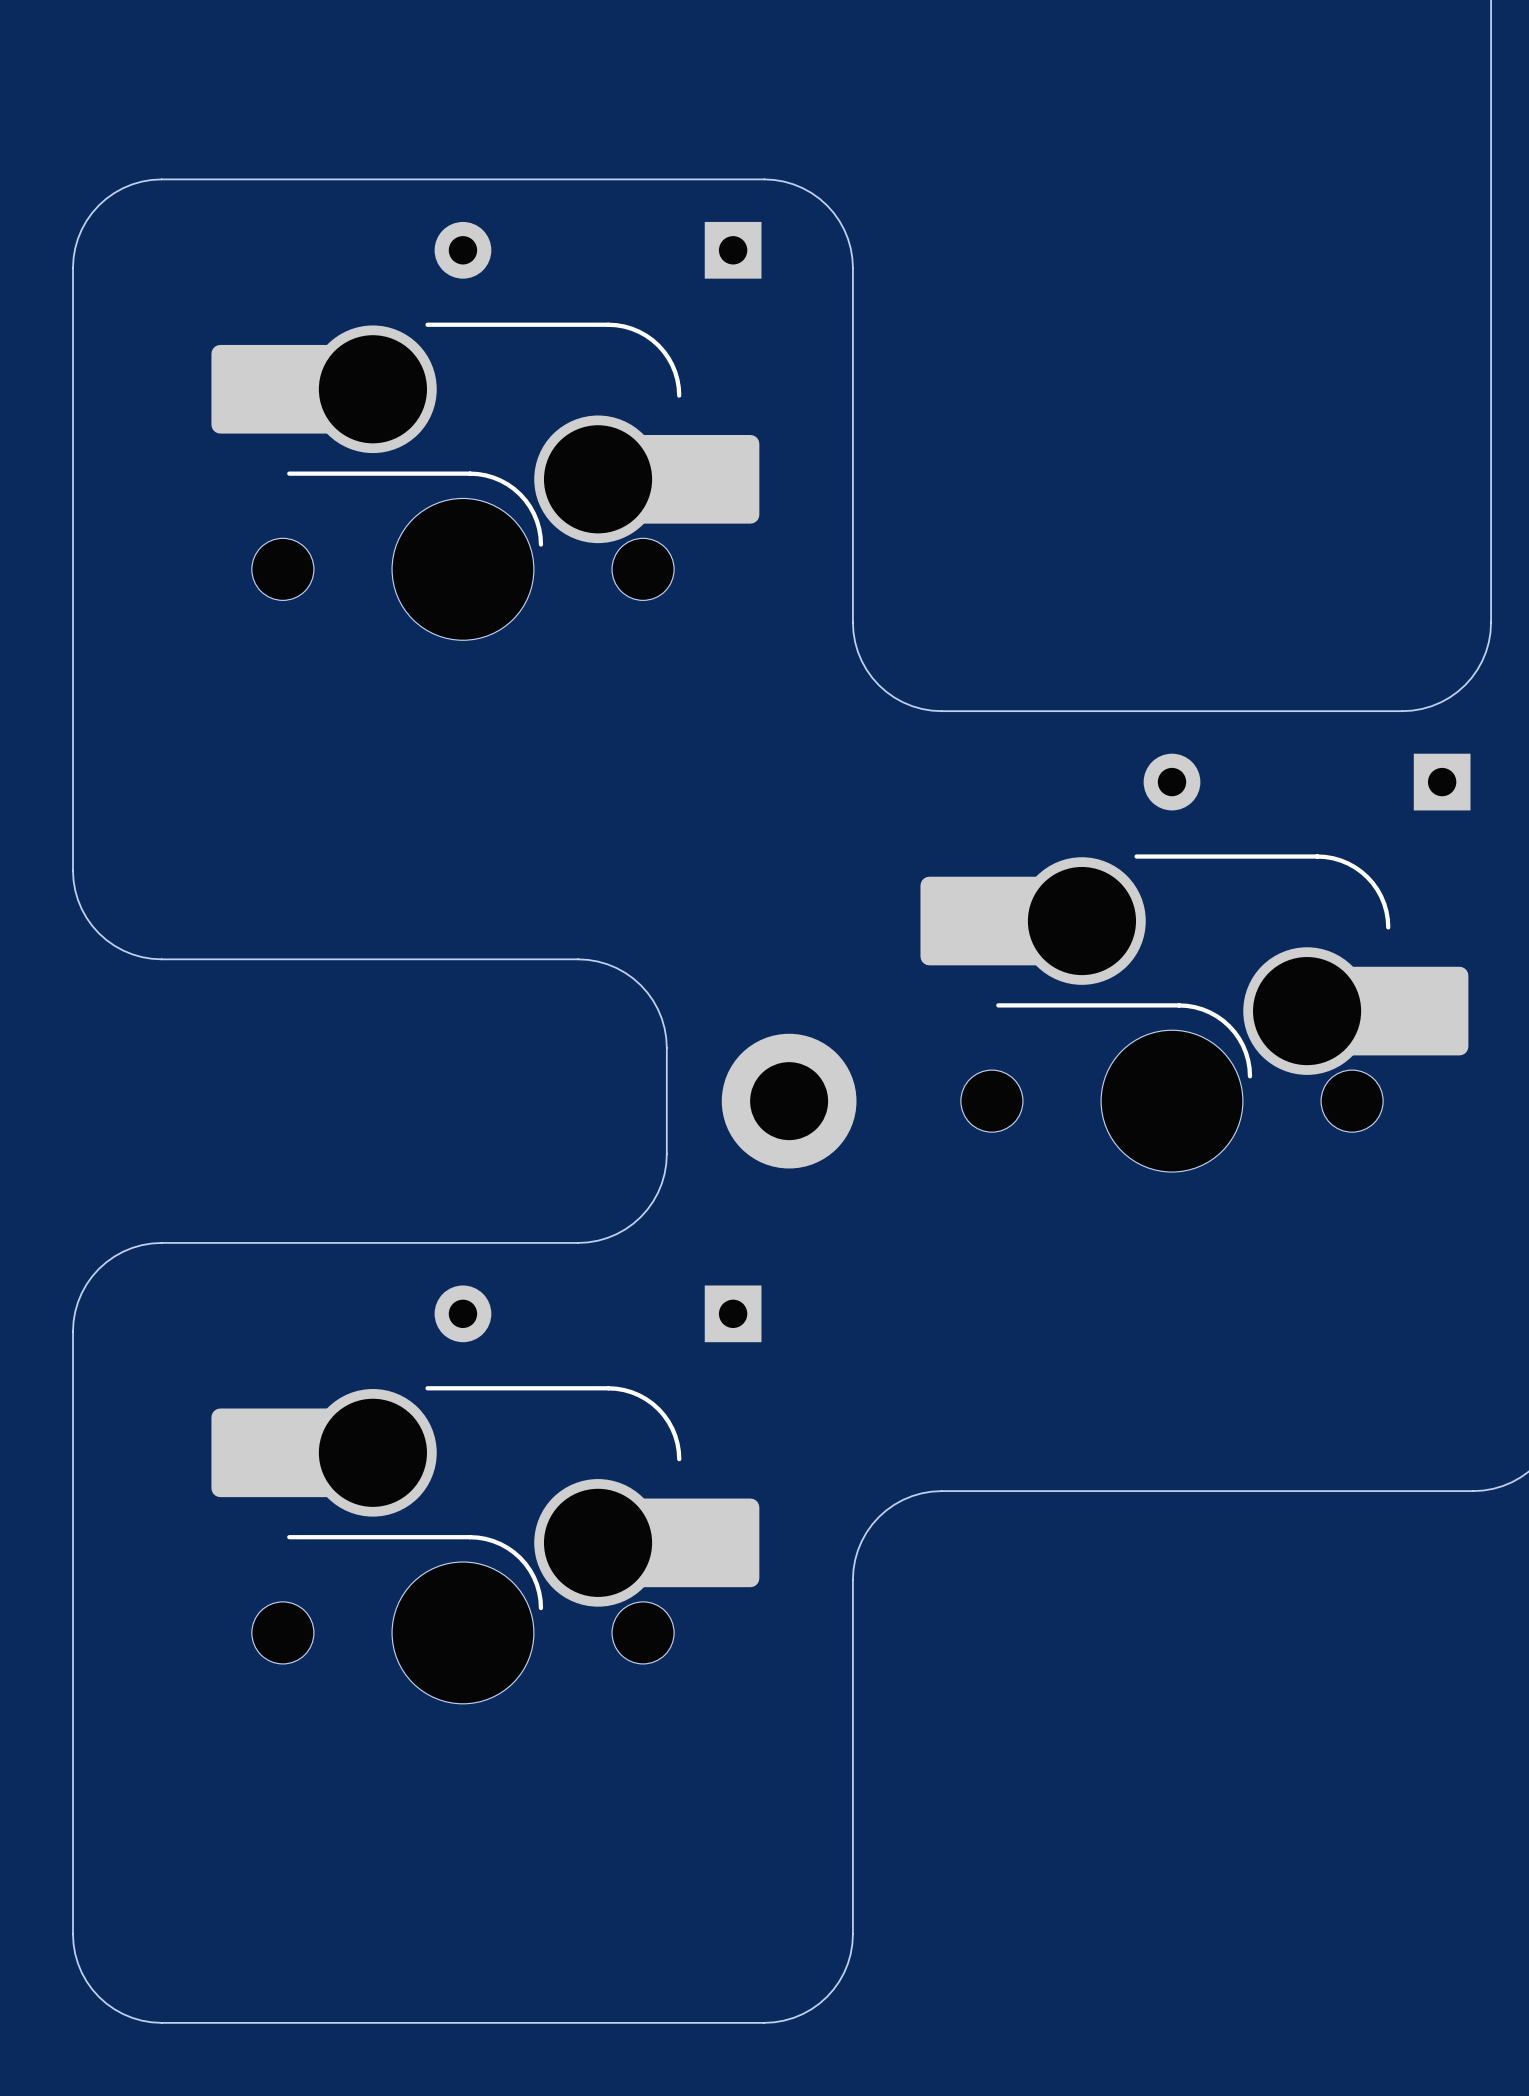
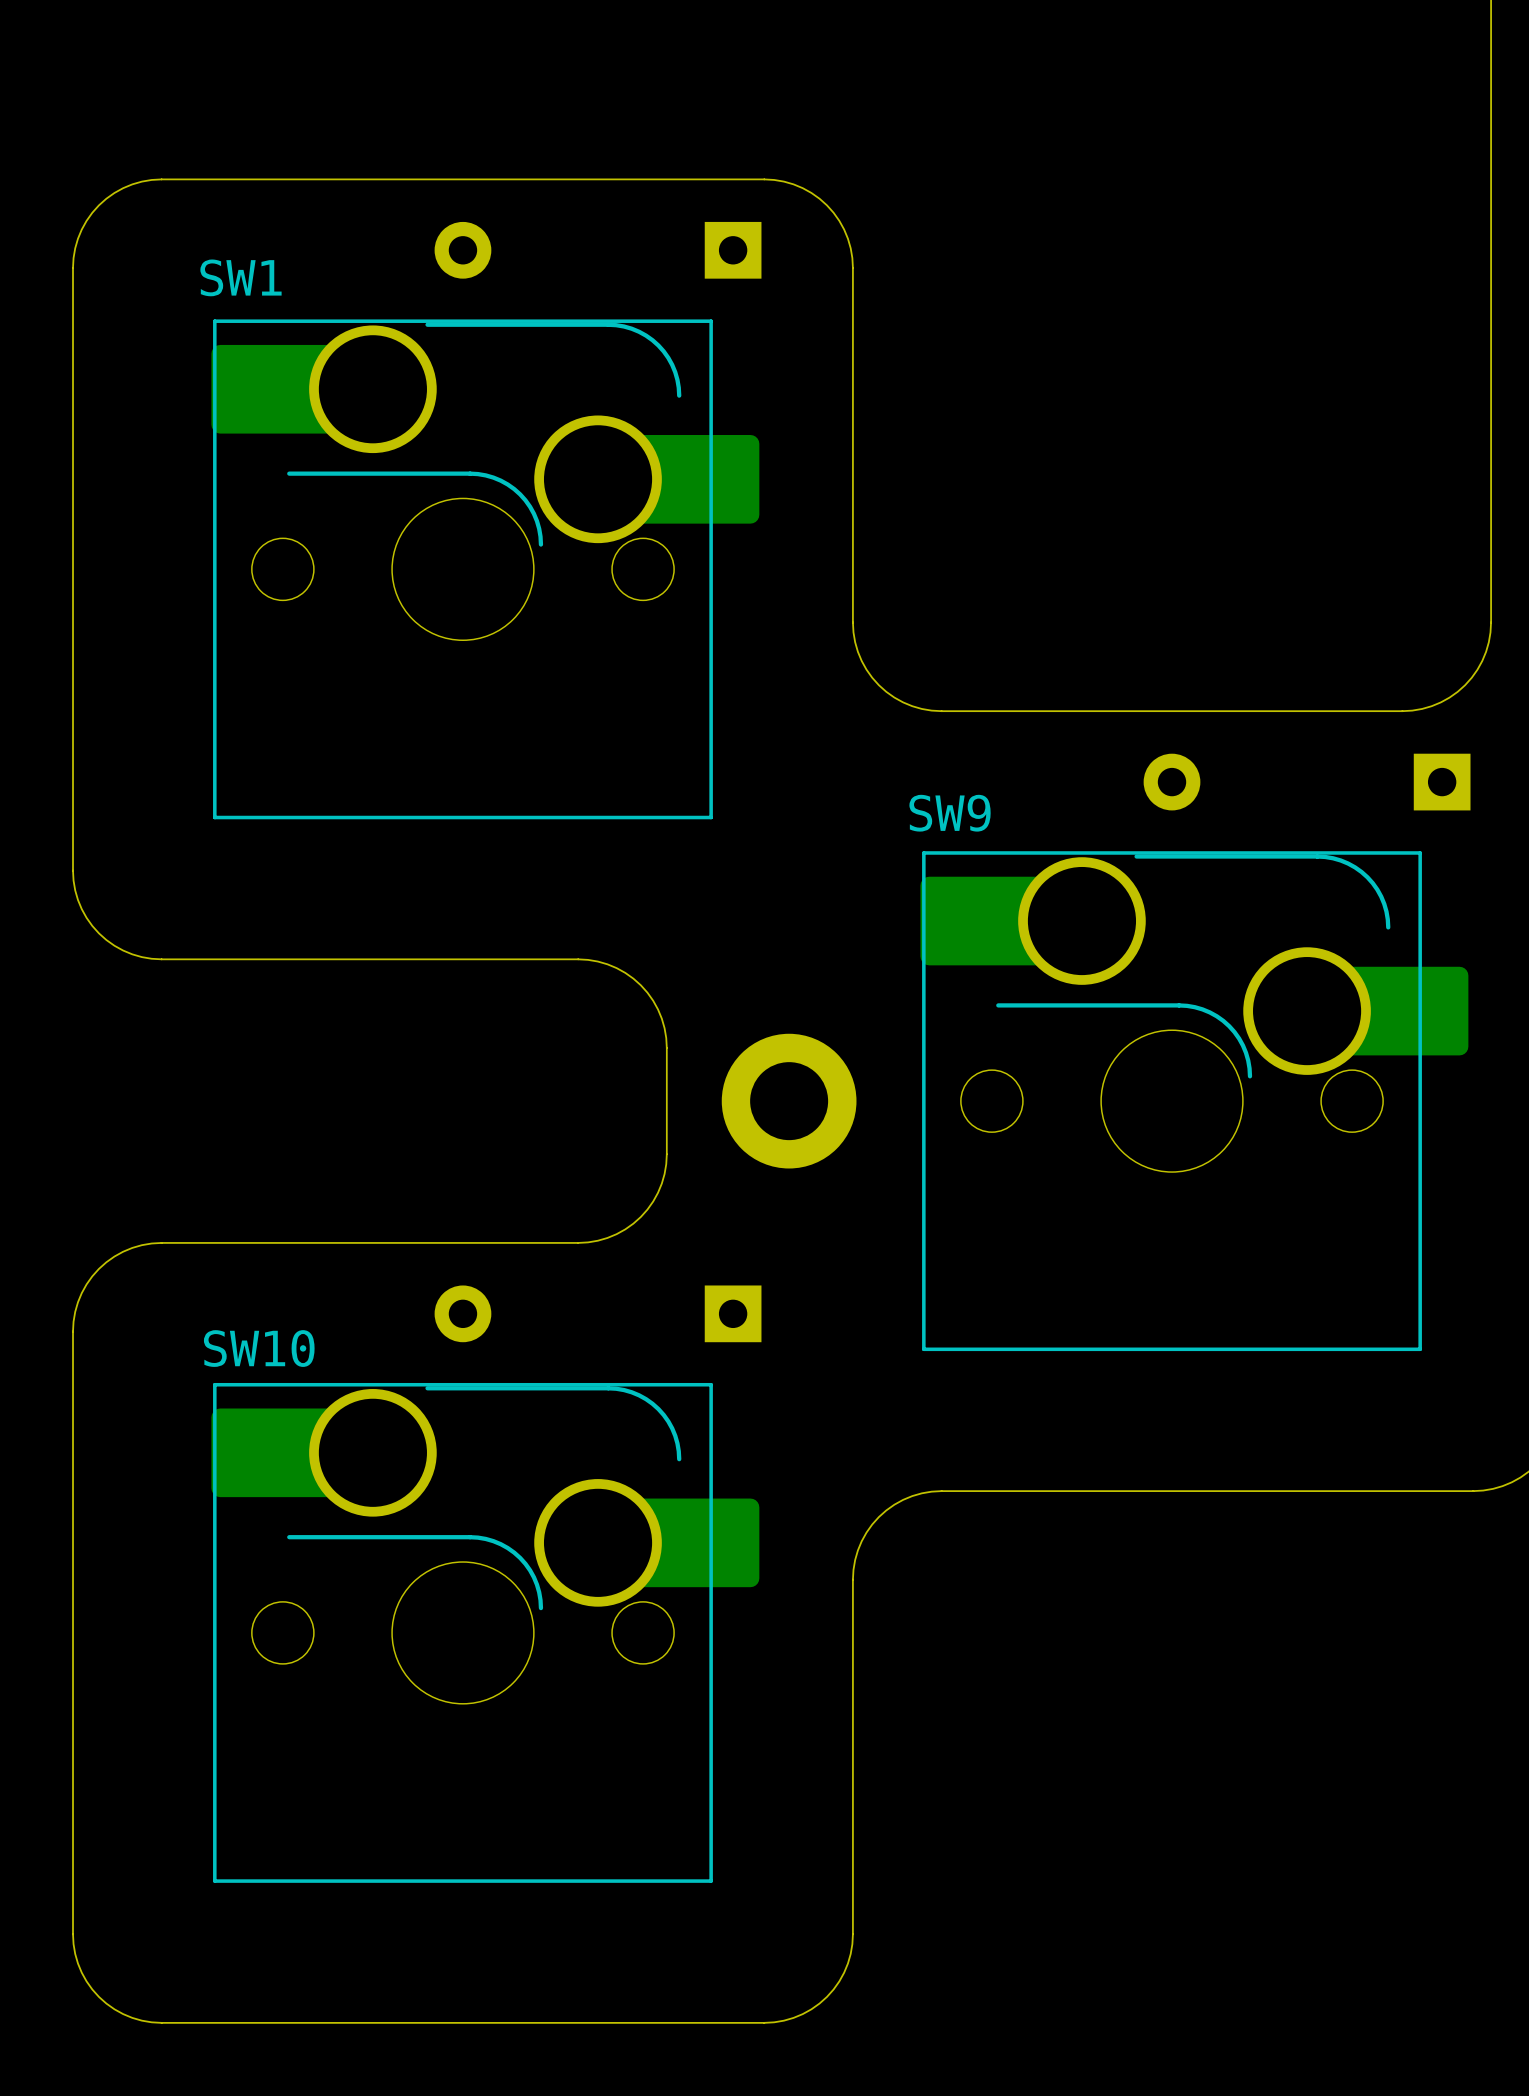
text: none -> SW1 (240, 277)
line: none -> (711, 321) (711, 817) (214, 817) (214, 321) (711, 321)
text: none -> SW9 (950, 813)
line: none -> (1420, 852) (923, 852) (923, 1349) (1420, 1349) (1420, 852)
text: none -> SW10 (259, 1348)
line: none -> (711, 1384) (214, 1384) (214, 1881) (711, 1881) (711, 1384)

